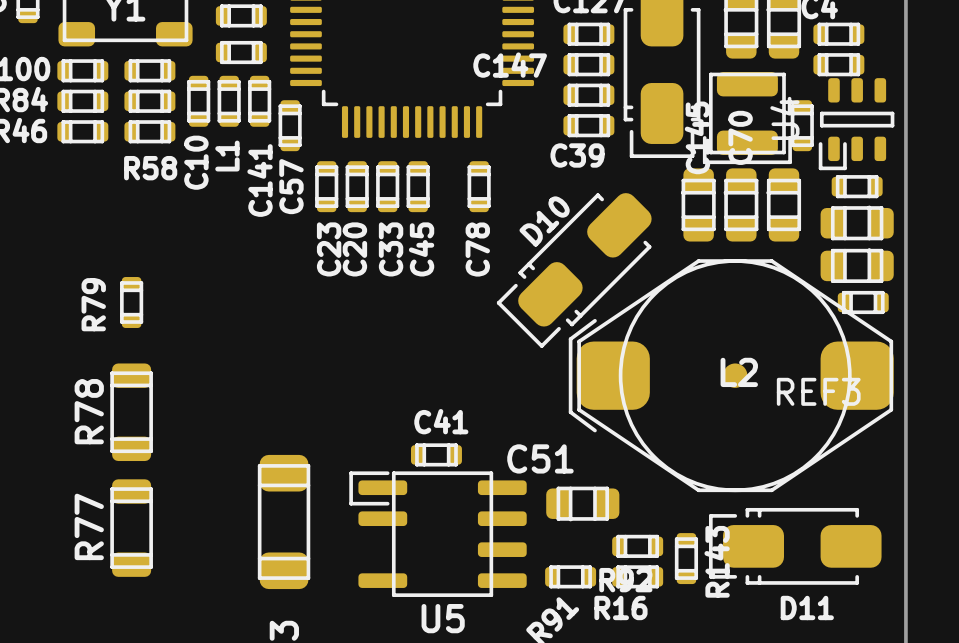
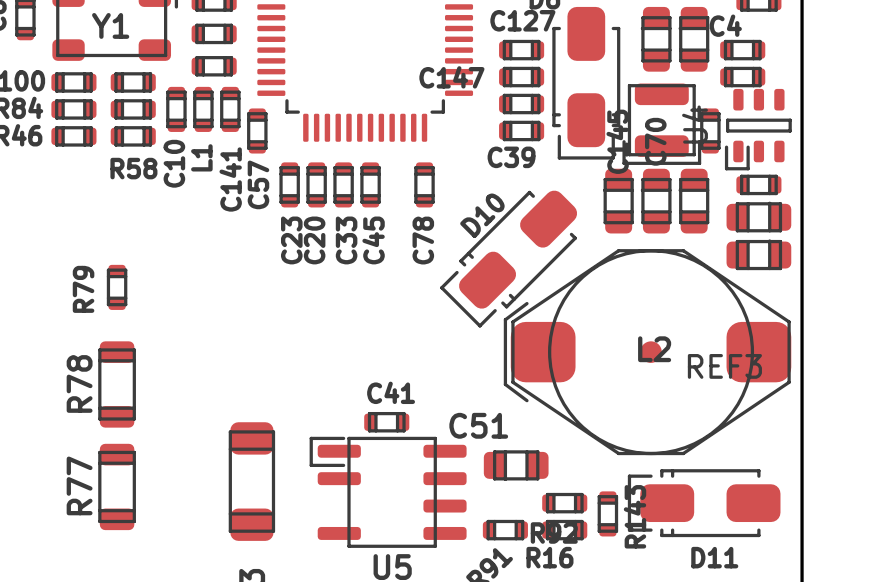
part: (863, 302) -> none

